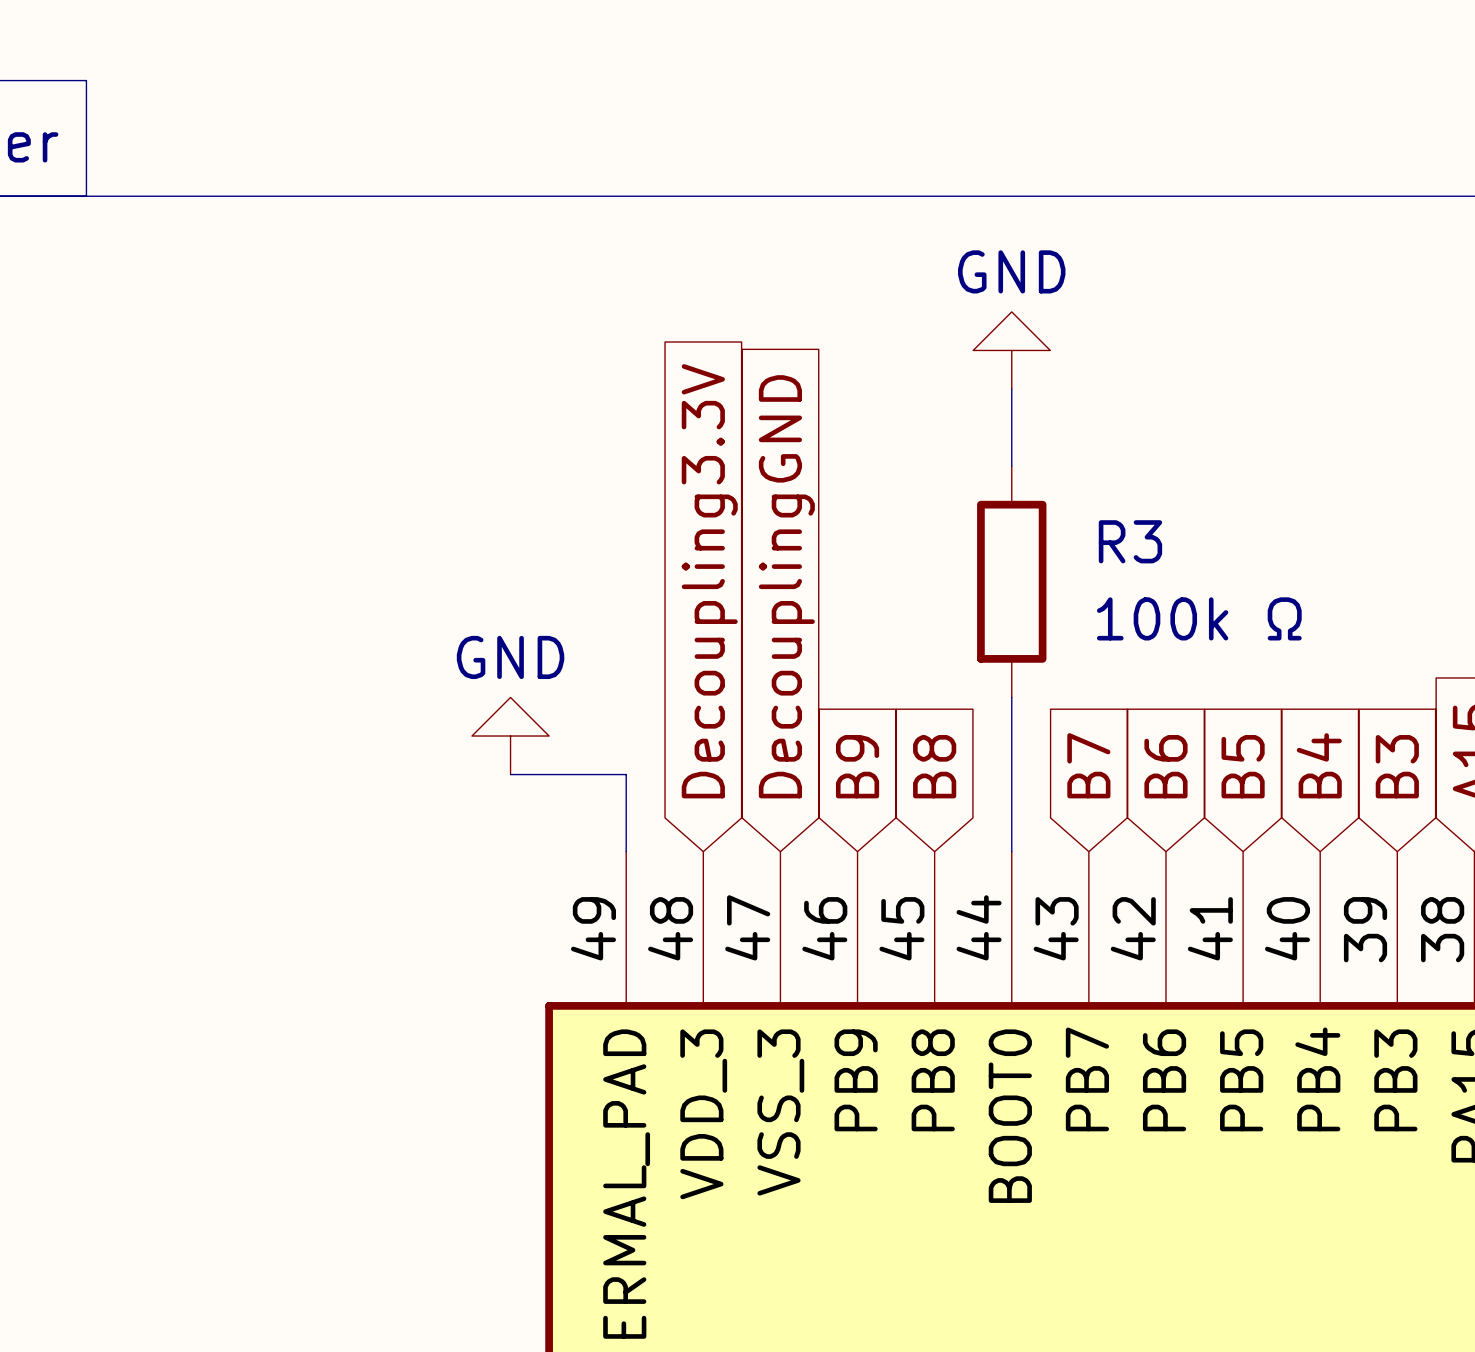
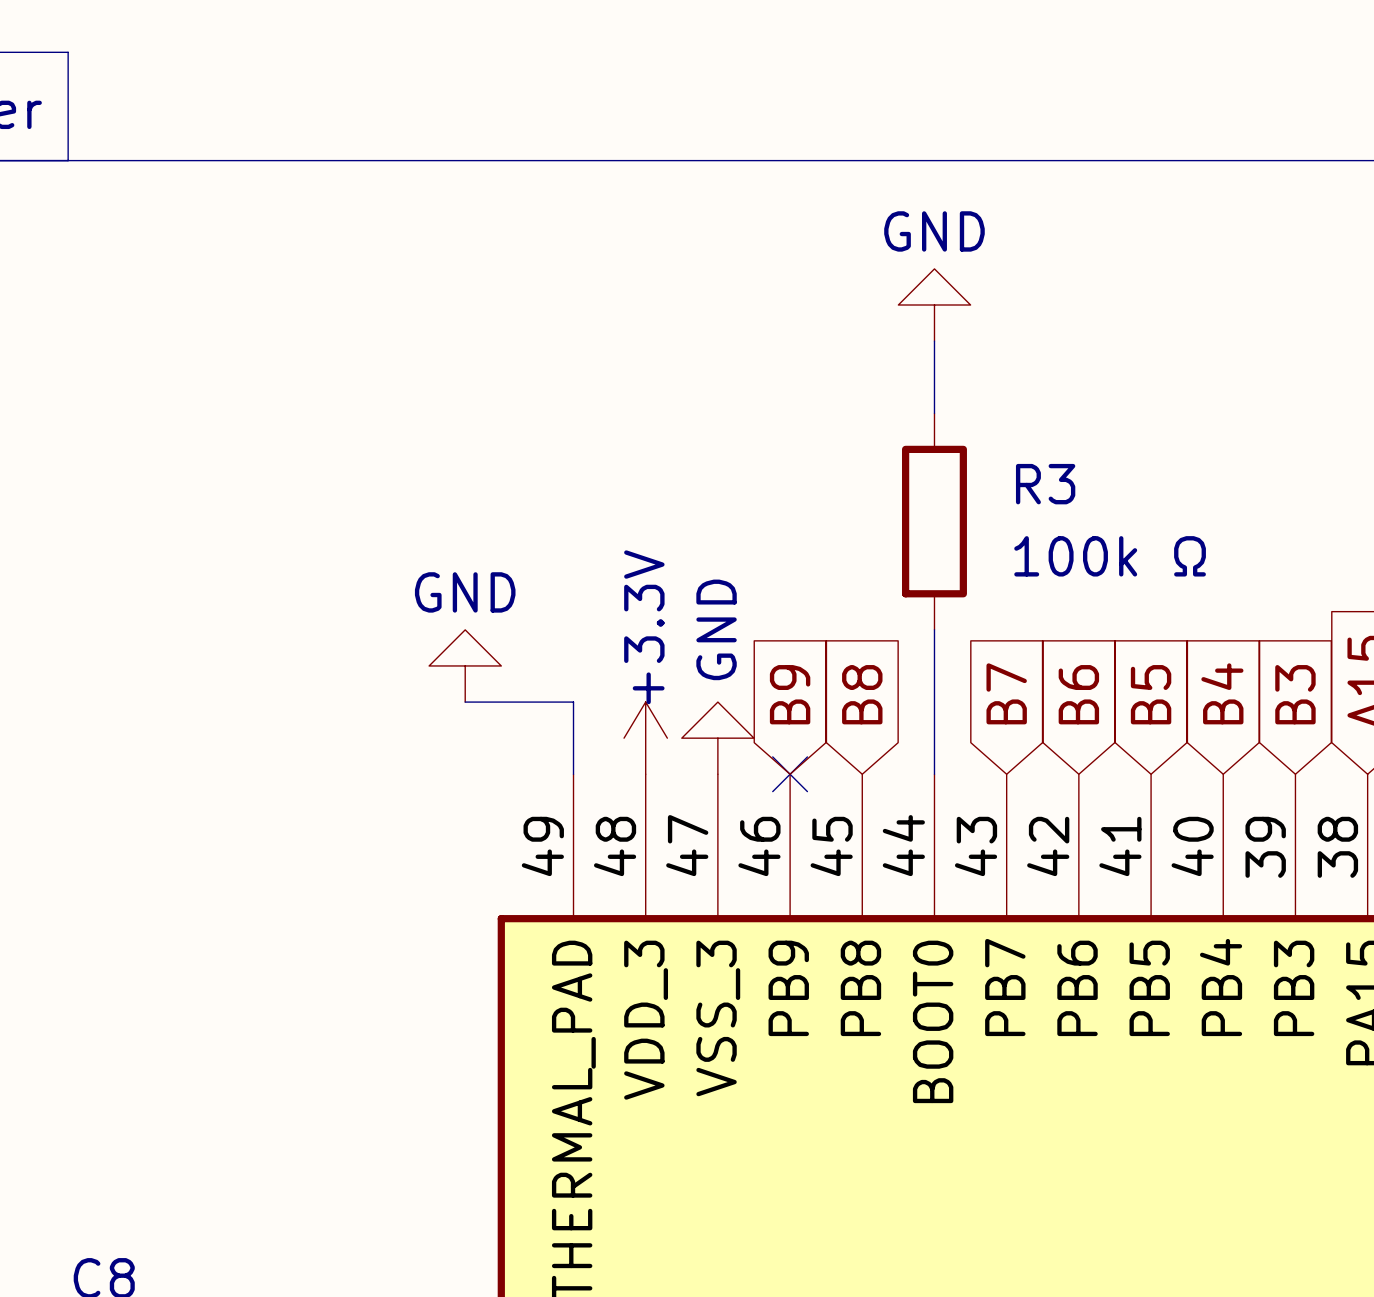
global label: Decoupling3.3V (709, 581) -> none
global label: DecouplingGND (786, 586) -> none
power symbol: none -> +3.3V (645, 738)
power symbol: none -> GND (717, 738)
no-connect mark: none -> (790, 774)

